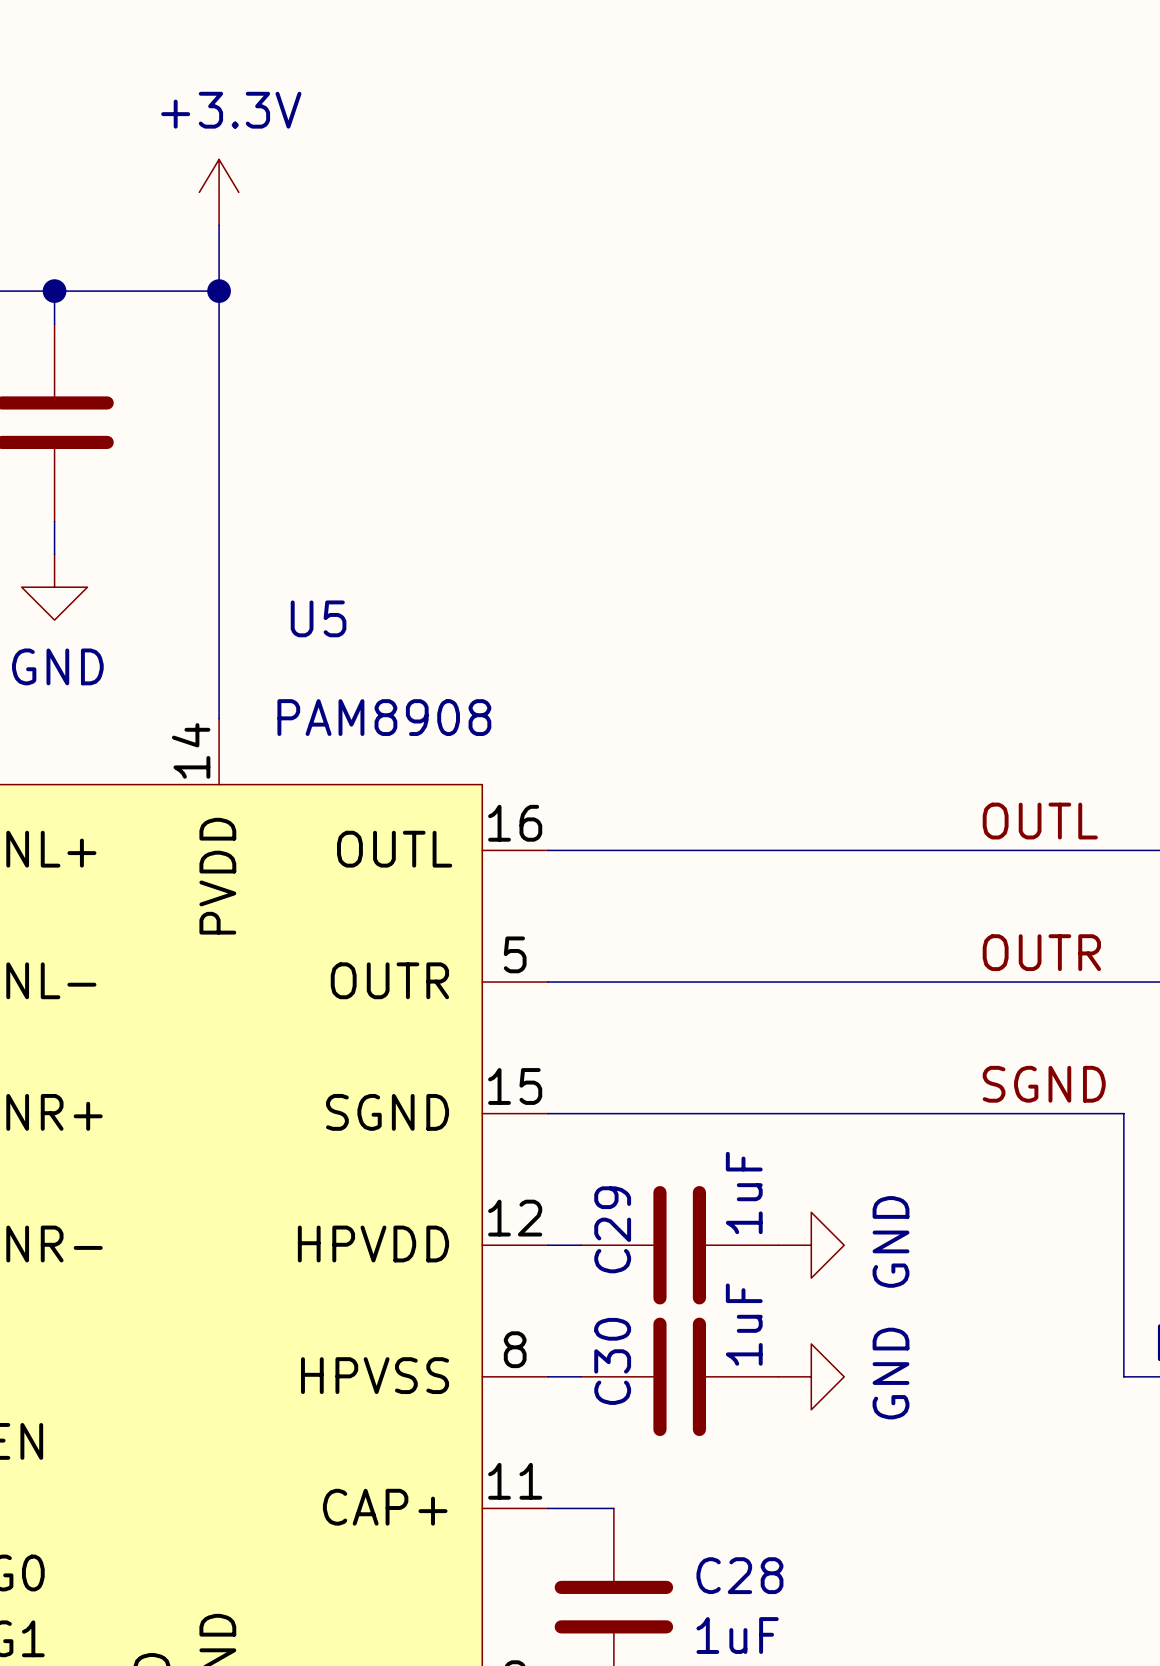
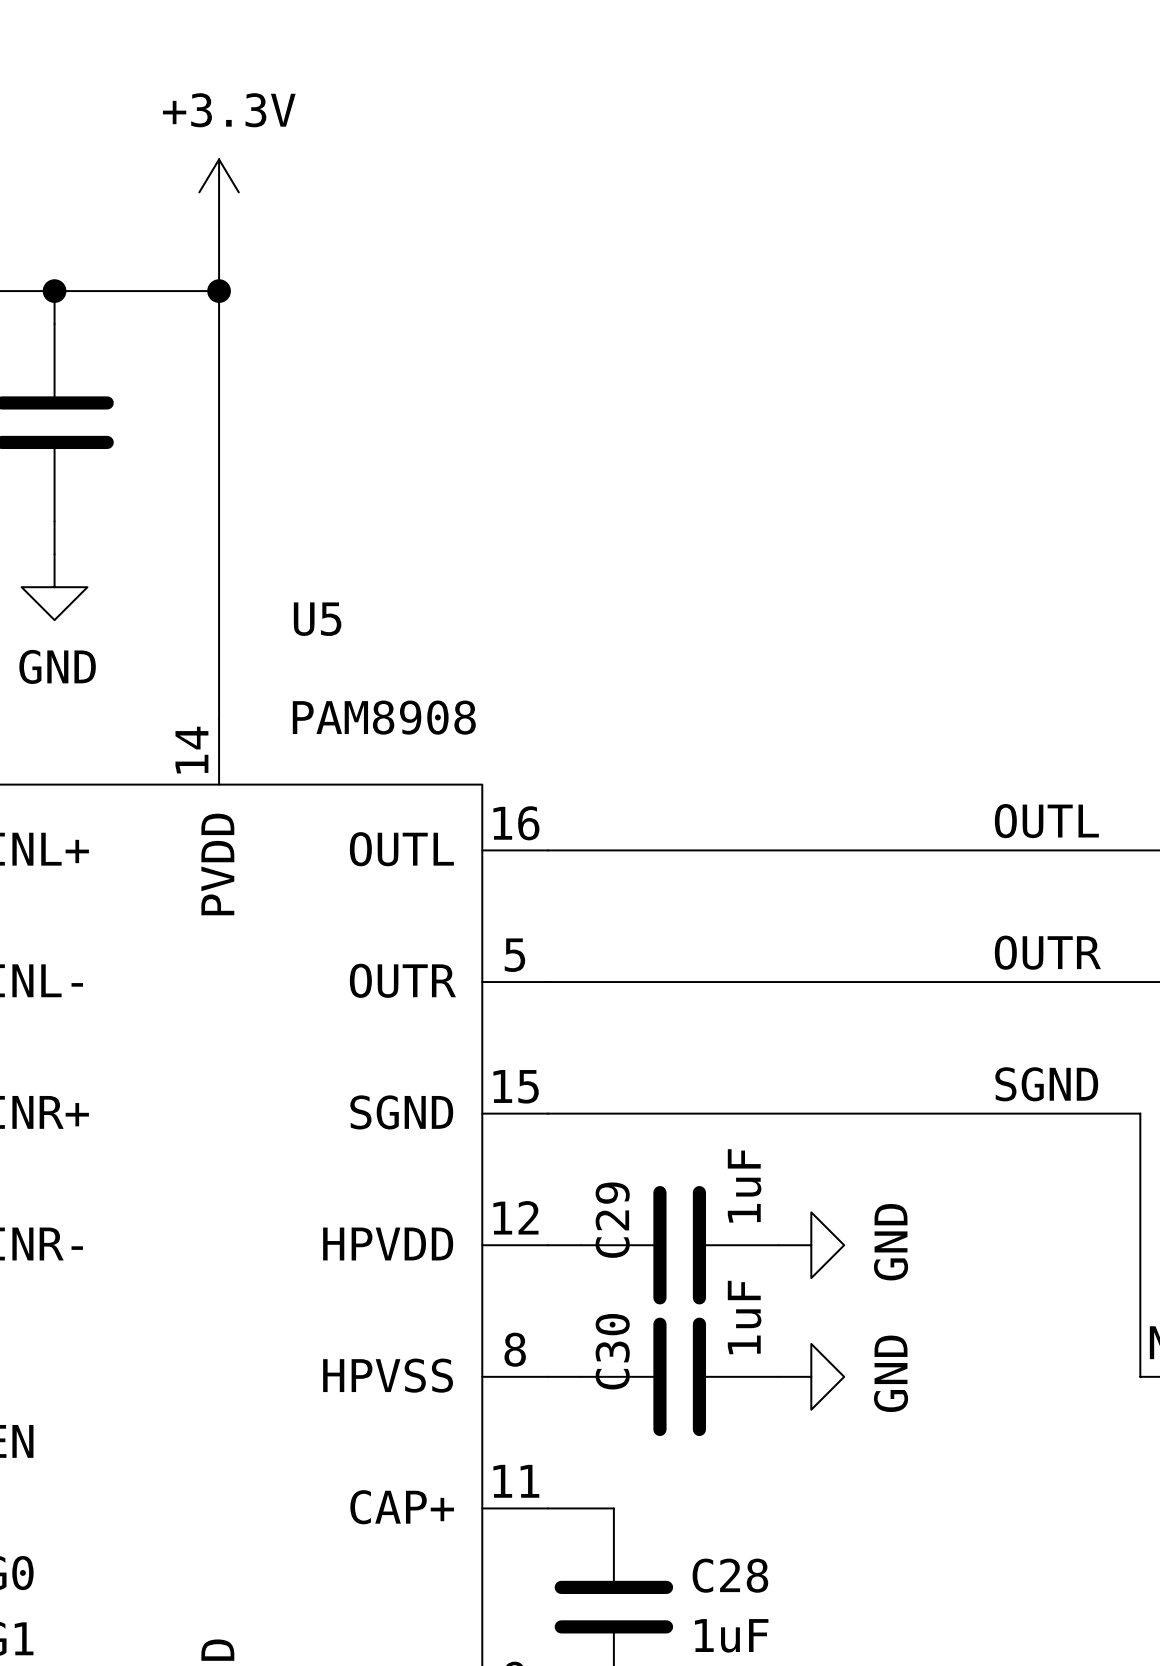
label position: OUTL (1040, 821) -> OUTL (1046, 821)
label position: OUTR (1041, 952) -> OUTR (1047, 952)
label position: SGND (1044, 1084) -> SGND (1046, 1084)
wire: (1123, 1113) (1123, 1376) (1140, 1376) -> (1123, 1113) (1140, 1113) (1140, 1376)

